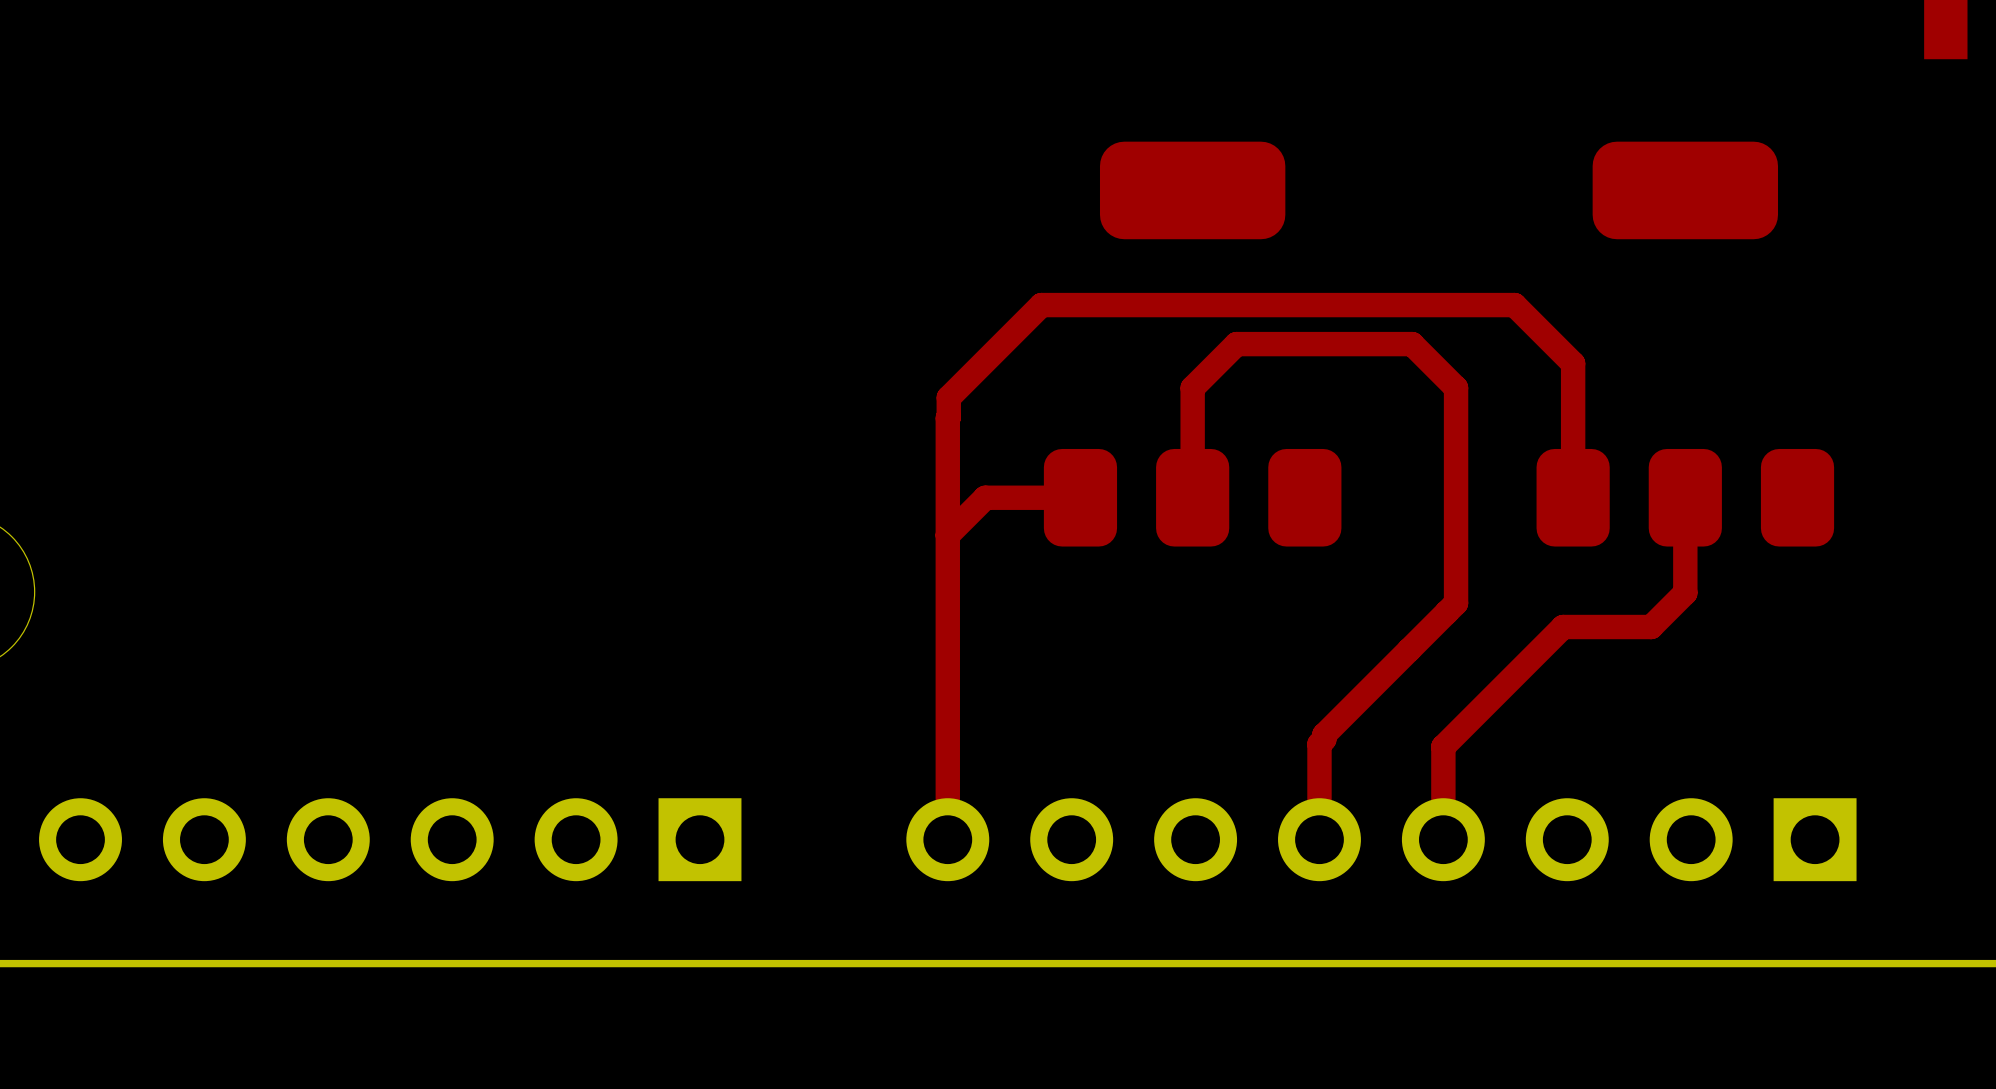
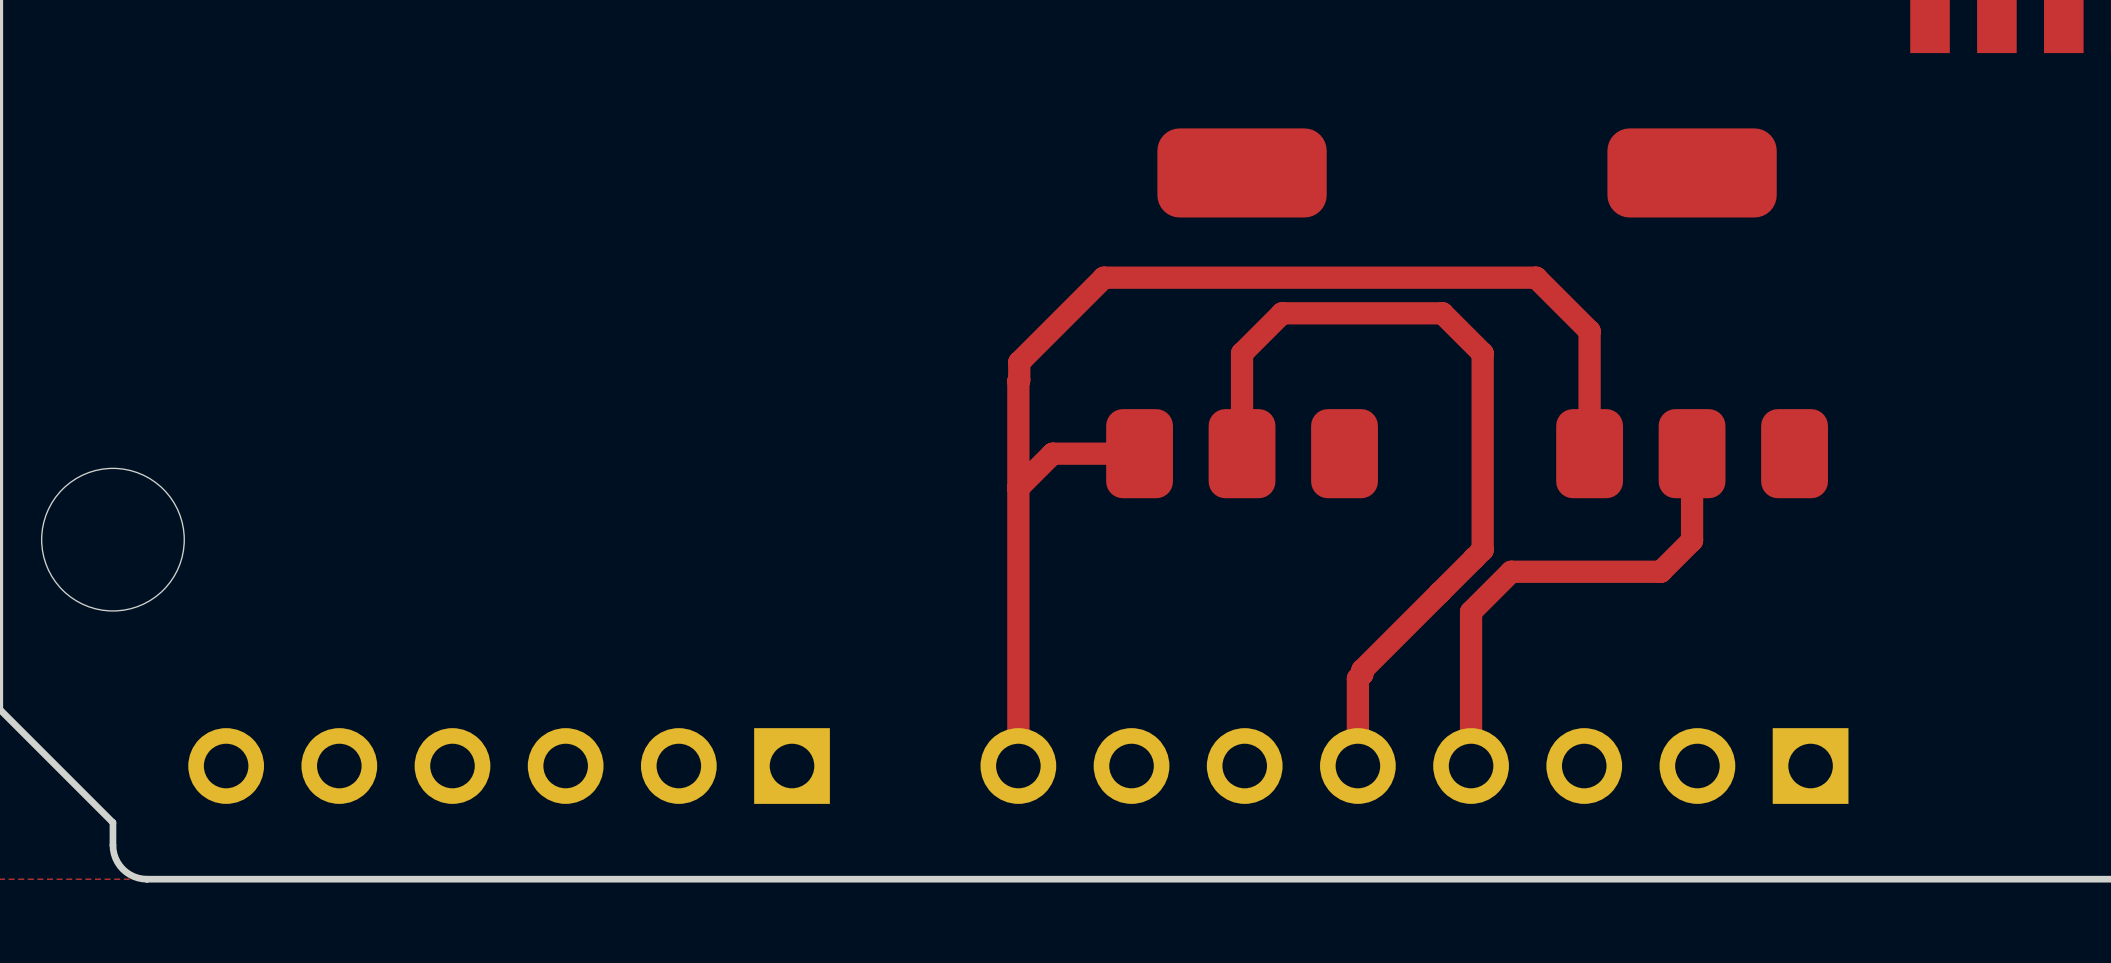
top track: (1563, 627) (1443, 746) -> (1580, 571) (1511, 571) (1471, 611) (1471, 681)

